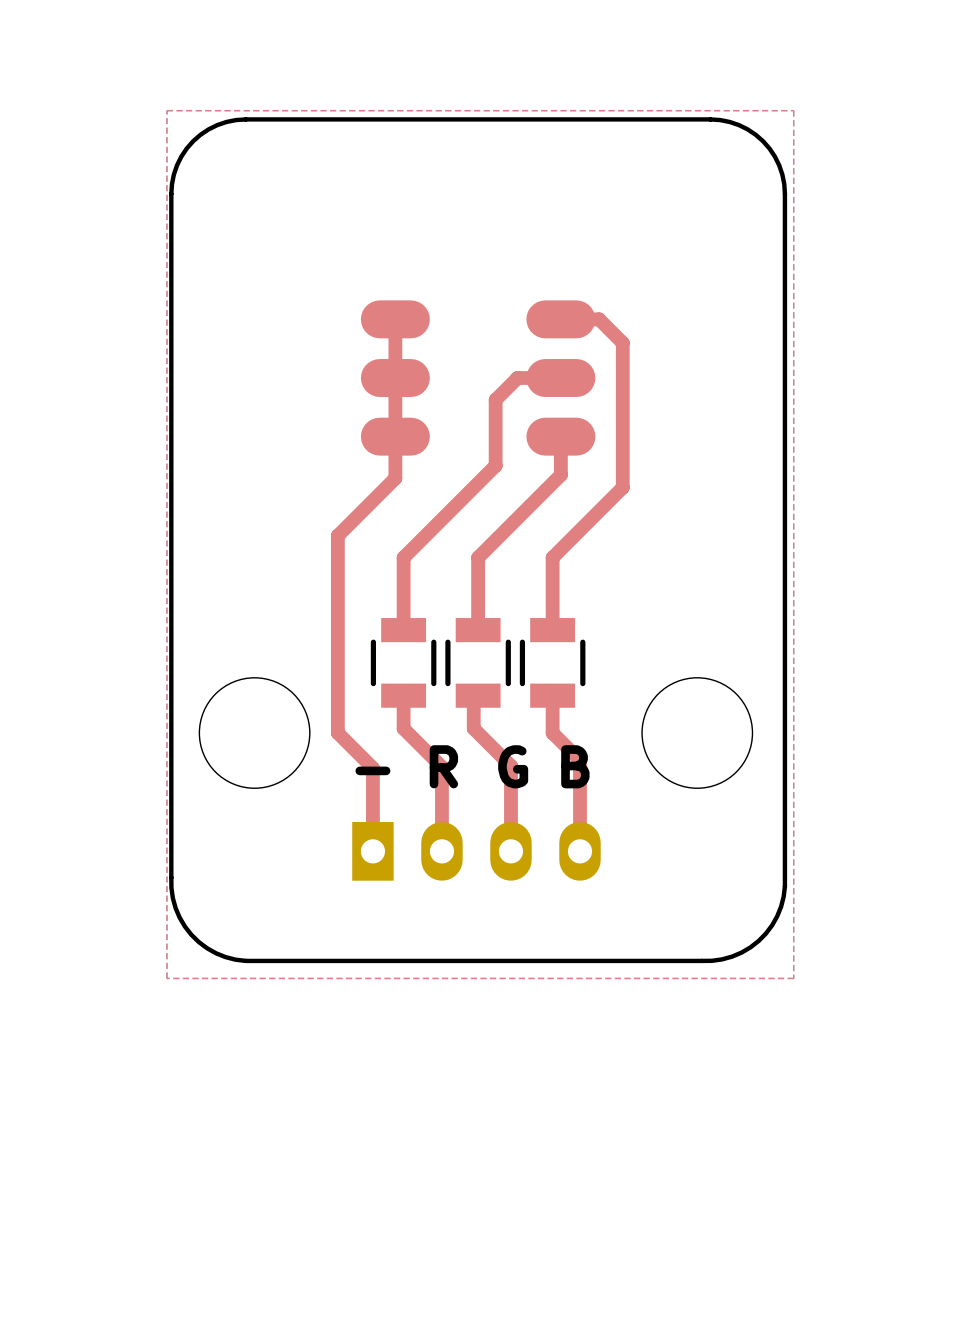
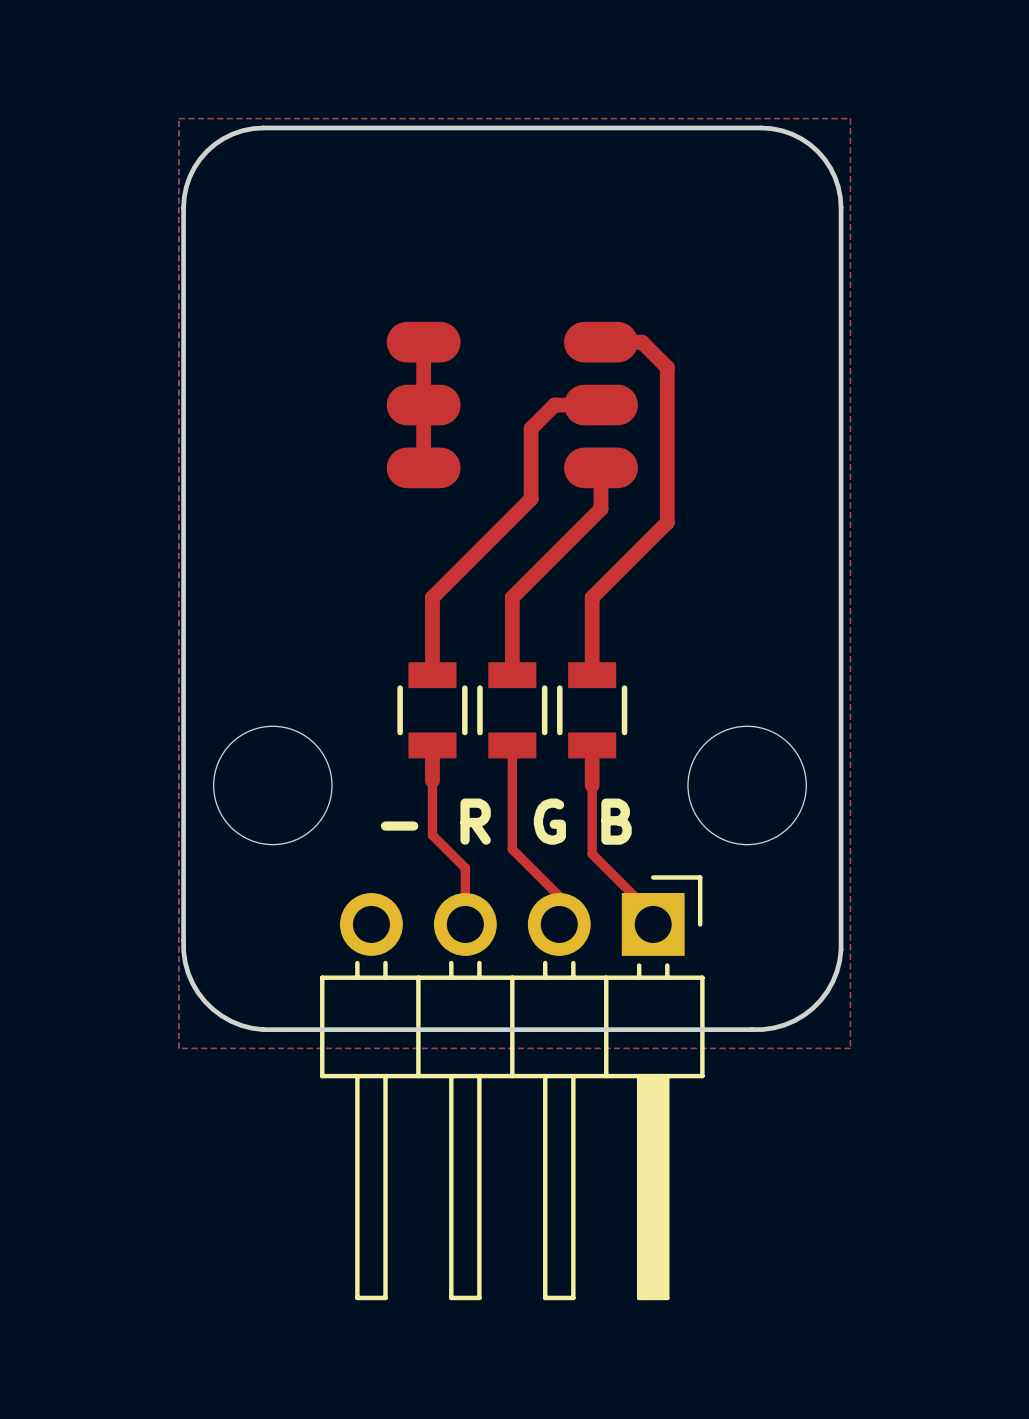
top track: (395, 436) (395, 478) (337, 535) (337, 733) (372, 768) (372, 851) -> none
top track: none -> (512, 745) (512, 849) (559, 896) (559, 924)
top track: (473, 700) (473, 728) (510, 765) (510, 851) -> none
top track: (403, 728) (441, 766) (441, 851) -> (432, 780) (432, 835) (465, 868) (465, 924)
top track: (552, 733) (580, 760) (580, 851) -> (592, 785) (592, 854) (653, 915) (653, 924)
part: (476, 851) -> none
part: none -> (512, 1087)

